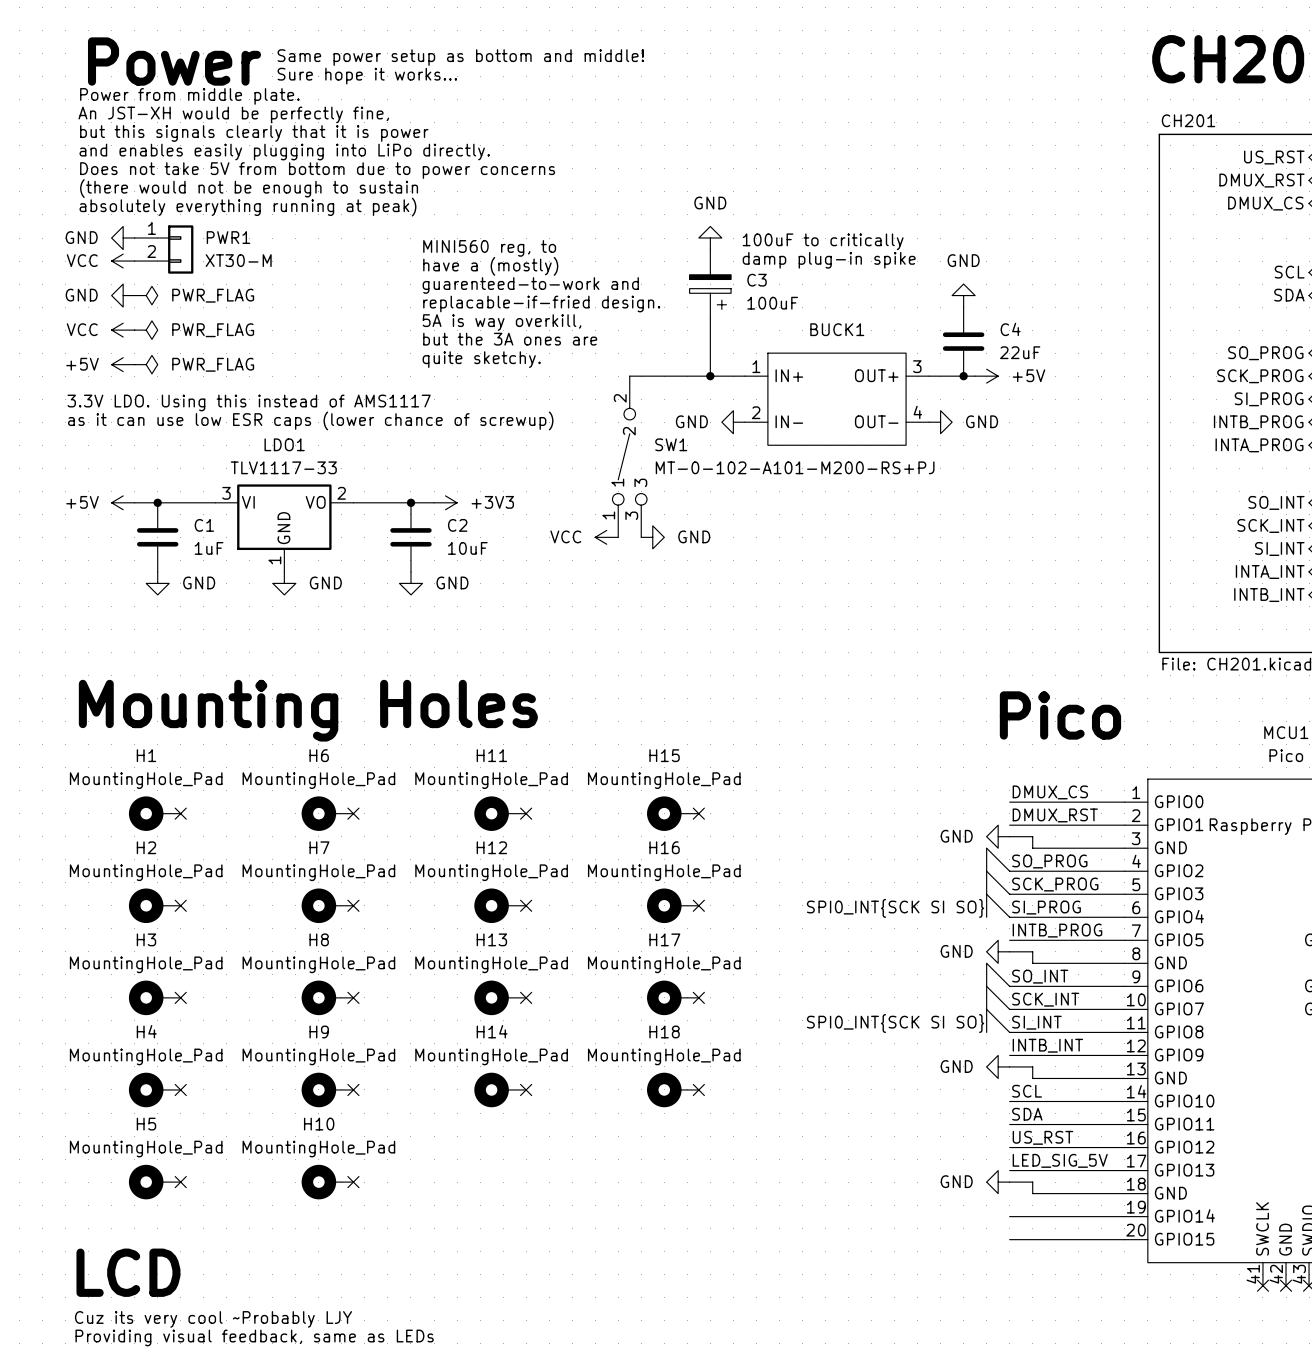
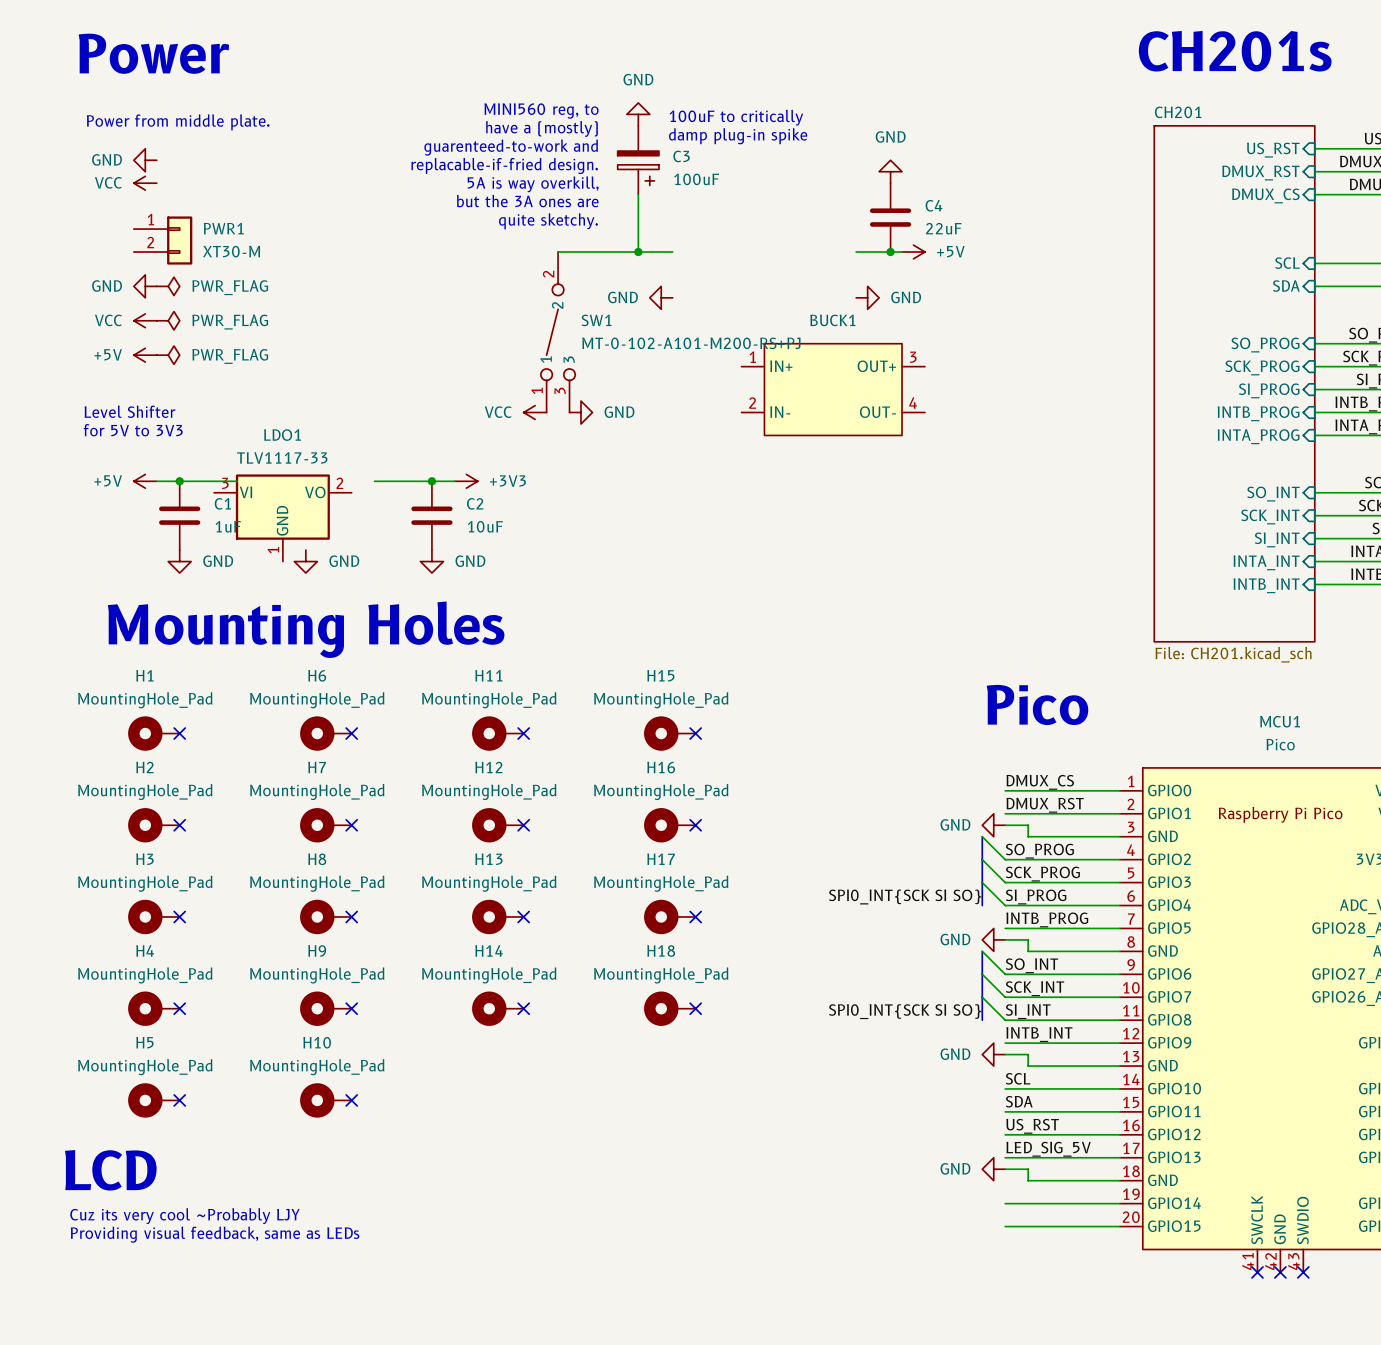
text: Same power setup as bottom and middle! (460, 57) -> none
text: Sure hope it works... (367, 76) -> none
text position: Power from middle plate. (189, 96) -> Power from middle plate. (178, 122)
text: An JST-XH would be perfectly fine, (233, 114) -> none
power symbol: none -> GND (638, 114)
text: but this signals clearly that it is power (254, 133) -> none
text: and enables easily plugging into LiPo directly. (284, 152) -> none
power symbol: none -> GND (145, 160)
text: Does not take 5V from bottom due to power concerns (317, 170) -> none
power symbol: none -> GND (890, 171)
text: (there would not be enough to sustain (249, 188) -> none
power symbol: none -> VCC (145, 183)
text: absolutely everything running at peak) (247, 207) -> none
power symbol: GND (123, 238) -> none
power symbol: GND (710, 238) -> none
text position: 100uF to critically (823, 241) -> 100uF to critically (736, 117)
text position: MINI560 reg, to (489, 248) -> MINI560 reg, to (541, 111)
text position: damp plug-in spike (829, 260) -> damp plug-in spike (738, 136)
power symbol: VCC (123, 261) -> none
junction: none -> (638, 251)
junction: none -> (890, 251)
text position: have a (mostly) (490, 266) -> have a (mostly) (541, 128)
C3 position: (710, 284) -> (638, 160)
text position: guarenteed-to-work and (530, 285) -> guarenteed-to-work and (511, 147)
power symbol: GND (123, 295) -> none
power symbol: PWR_FLAG (146, 295) -> GND (145, 286)
power symbol: none -> PWR_FLAG (168, 286)
power symbol: GND (963, 295) -> none
text position: replacable-if-fried design. (541, 304) -> replacable-if-fried design. (504, 166)
power symbol: none -> GND (661, 297)
power symbol: none -> GND (867, 297)
wire: (710, 318) (710, 376) -> (638, 194) (638, 251)
text position: 5A is way overkill, (501, 322) -> 5A is way overkill, (533, 184)
power symbol: VCC (123, 330) -> none
power symbol: PWR_FLAG (146, 330) -> VCC (145, 320)
power symbol: none -> PWR_FLAG (168, 320)
text position: but the 3A ones are (510, 339) -> but the 3A ones are (527, 201)
C4 position: (963, 341) -> (890, 217)
text position: quite sketchy. (481, 359) -> quite sketchy. (548, 221)
power symbol: +5V (123, 364) -> none
power symbol: PWR_FLAG (146, 364) -> +5V (145, 355)
power symbol: none -> PWR_FLAG (168, 355)
wire: (629, 376) (744, 376) -> (558, 251) (672, 251)
junction: (710, 376) -> none
wire: (929, 376) (975, 376) -> (856, 251) (902, 251)
junction: (963, 376) -> none
power symbol position: +5V (986, 376) -> +5V (913, 251)
text: 3.3V LDO. Using this instead of AMS1117 (249, 402) -> none
text: as it can use low ESR caps (lower chance of screwup) (310, 420) -> none
text: none -> Level Shifter (130, 411)
power symbol: none -> GND (580, 412)
power symbol: GND (733, 422) -> none
power symbol: GND (940, 422) -> none
text: none -> for 5V to 3V3 (133, 430)
SW1 position: (629, 456) -> (558, 332)
power symbol position: +5V (123, 502) -> +5V (145, 481)
wire: (134, 502) (215, 502) -> (156, 481) (237, 481)
junction position: (157, 502) -> (179, 481)
wire: (353, 502) (434, 502) -> (374, 481) (454, 481)
junction position: (410, 502) -> (431, 481)
power symbol position: +3V3 (445, 502) -> +3V3 (466, 481)
C1 position: (157, 537) -> (179, 515)
C2 position: (410, 537) -> (431, 515)
power symbol position: VCC (606, 537) -> VCC (535, 412)
power symbol: GND (652, 537) -> none
power symbol position: GND (157, 583) -> GND (179, 561)
power symbol position: GND (284, 583) -> GND (305, 561)
power symbol position: GND (410, 583) -> GND (431, 561)
text position: Mounting Holes (308, 710) -> Mounting Holes (306, 629)
no-connect mark: none -> (179, 733)
no-connect mark: none -> (351, 733)
no-connect mark: none -> (523, 733)
no-connect mark: none -> (695, 733)
H1 position: (154, 813) -> (153, 733)
no-connect mark position: (180, 813) -> (179, 825)
H6 position: (327, 813) -> (325, 733)
no-connect mark position: (353, 813) -> (351, 825)
H11 position: (500, 813) -> (497, 733)
no-connect mark position: (526, 813) -> (523, 825)
H15 position: (672, 813) -> (669, 733)
no-connect mark position: (698, 813) -> (695, 825)
H2 position: (154, 905) -> (153, 825)
no-connect mark position: (180, 905) -> (179, 916)
H7 position: (327, 905) -> (325, 825)
no-connect mark position: (353, 905) -> (351, 916)
H12 position: (500, 905) -> (497, 825)
no-connect mark position: (526, 905) -> (523, 916)
H16 position: (672, 905) -> (669, 825)
no-connect mark position: (698, 905) -> (695, 916)
H3 position: (154, 997) -> (153, 916)
no-connect mark position: (180, 997) -> (179, 1008)
H8 position: (327, 997) -> (325, 916)
no-connect mark position: (353, 997) -> (351, 1008)
H13 position: (500, 997) -> (497, 916)
no-connect mark position: (526, 997) -> (523, 1008)
H17 position: (672, 997) -> (669, 916)
no-connect mark position: (698, 997) -> (695, 1008)
H4 position: (154, 1089) -> (153, 1008)
no-connect mark position: (180, 1089) -> (179, 1100)
H9 position: (327, 1089) -> (325, 1008)
no-connect mark position: (353, 1089) -> (351, 1100)
H14 position: (500, 1089) -> (497, 1008)
no-connect mark: (526, 1089) -> none
H18 position: (672, 1089) -> (669, 1008)
no-connect mark: (698, 1089) -> none
H5 position: (154, 1182) -> (153, 1100)
no-connect mark: (180, 1182) -> none
H10 position: (327, 1182) -> (325, 1100)
no-connect mark: (353, 1182) -> none
text position: LCD (128, 1272) -> LCD (110, 1170)
text position: Cuz its very cool ~Probably LJY (213, 1319) -> Cuz its very cool ~Probably LJY (184, 1216)
text position: Providing visual feedback, same as LEDs (254, 1337) -> Providing visual feedback, same as LEDs (215, 1234)

